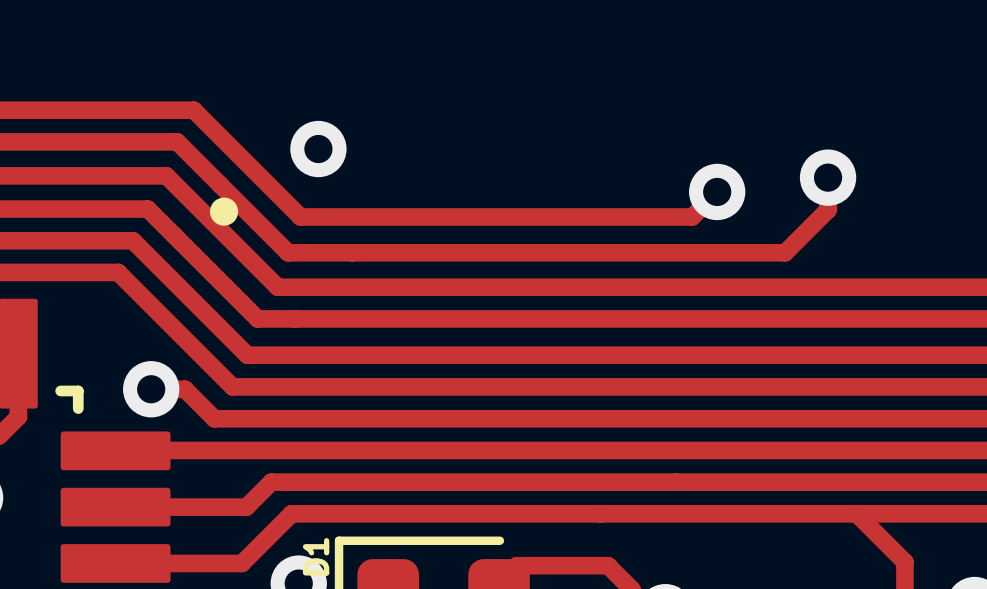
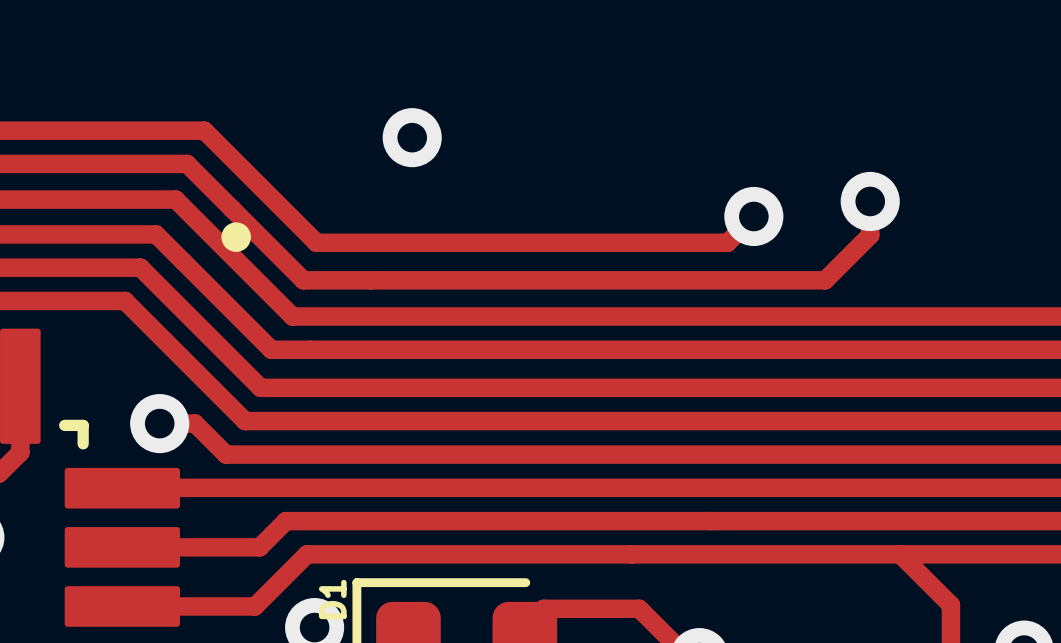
via position: (318, 149) -> (412, 137)

